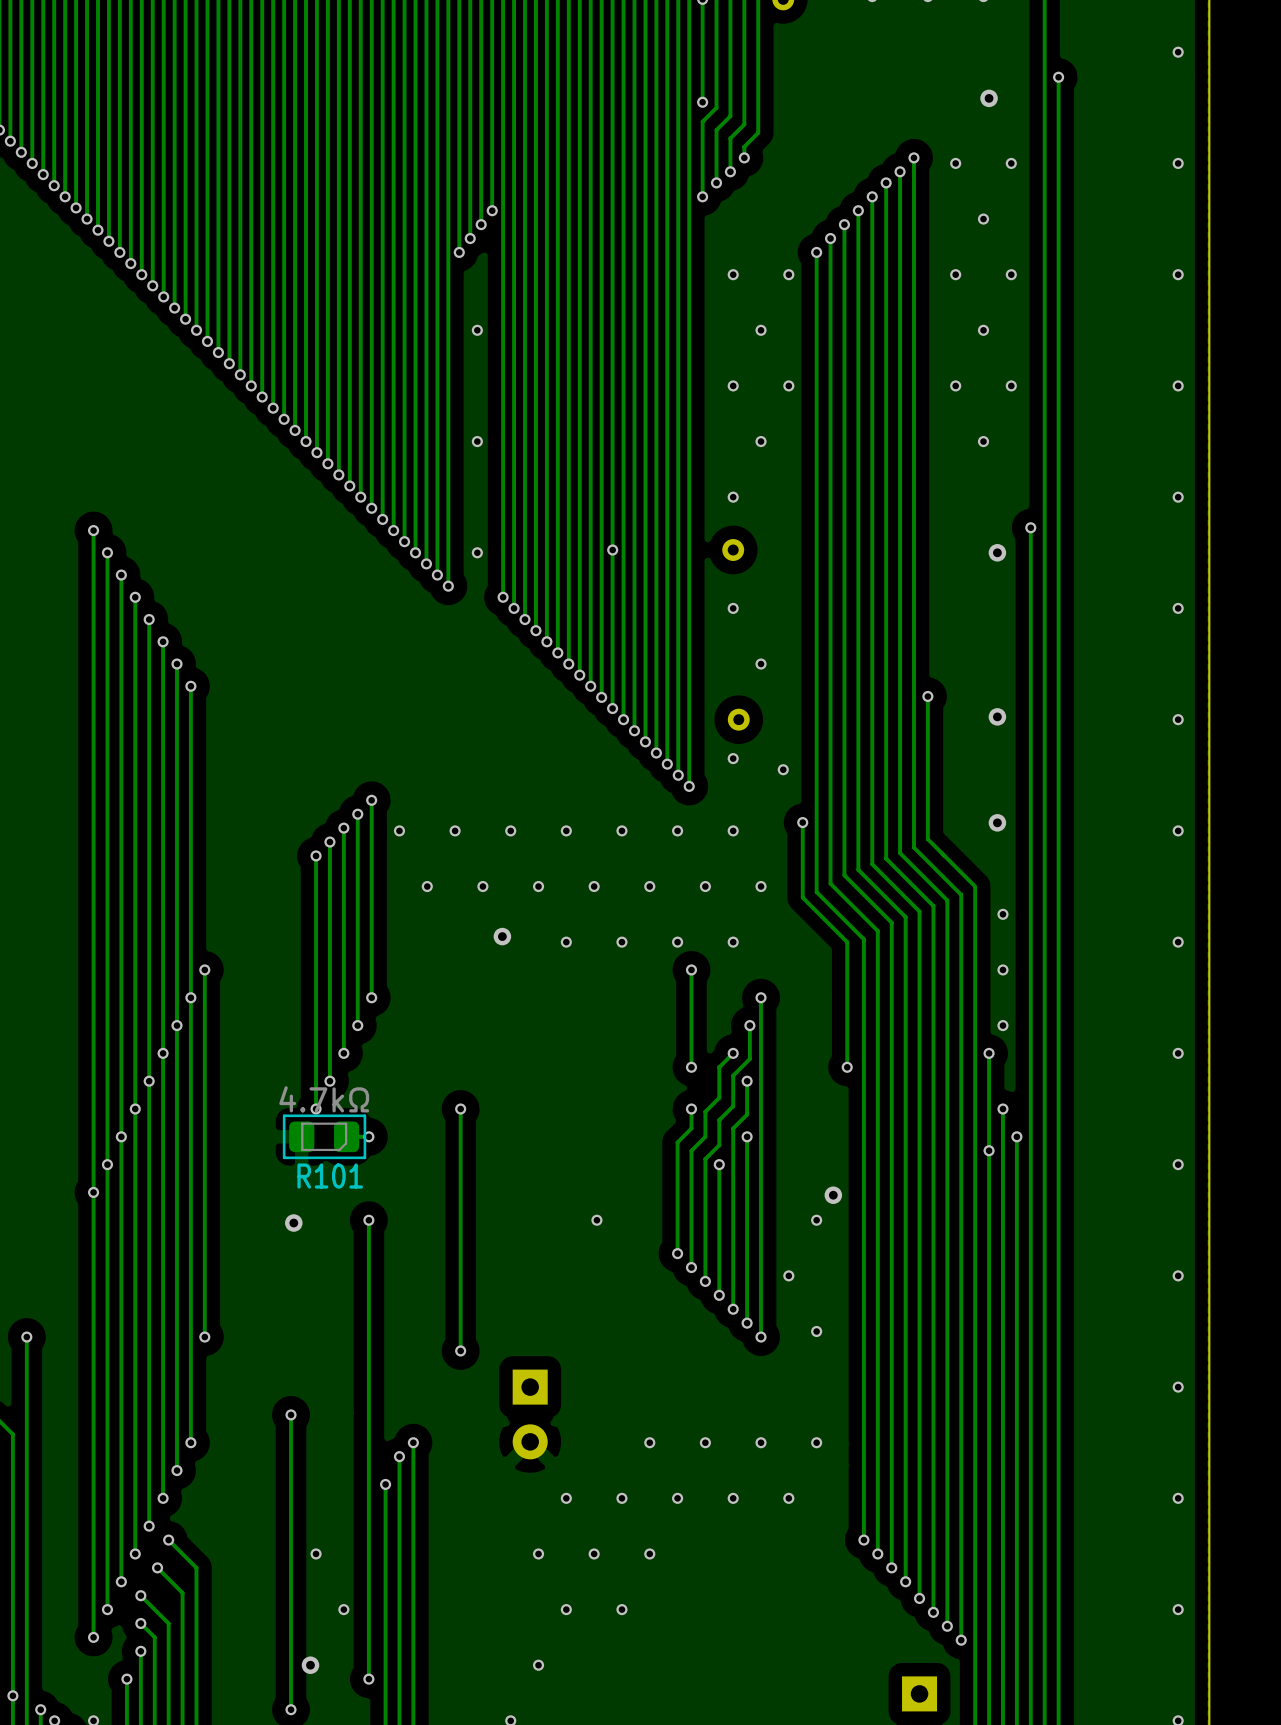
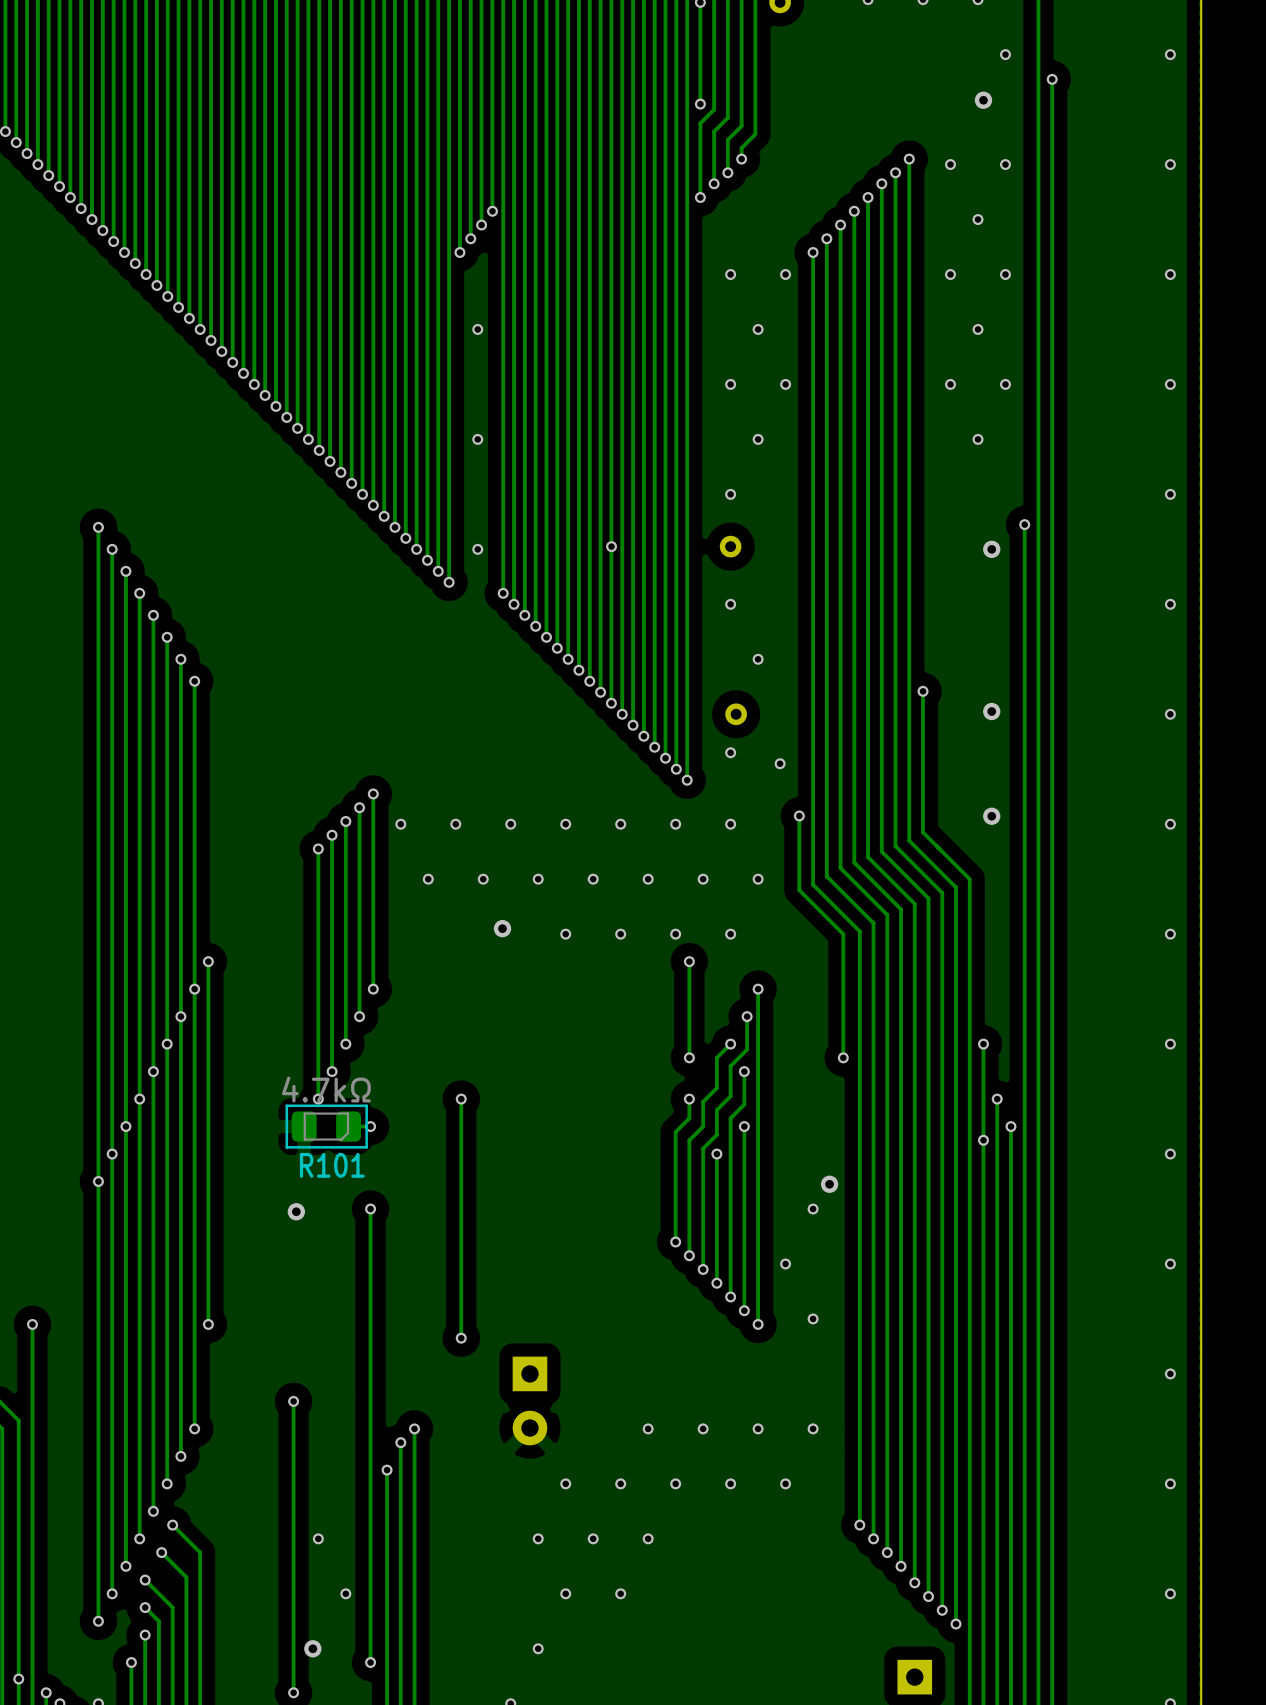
via: none -> (1005, 54)
via: (1002, 914) -> none
via: (1002, 969) -> none
via: (1002, 1025) -> none
via: (596, 1220) -> none

